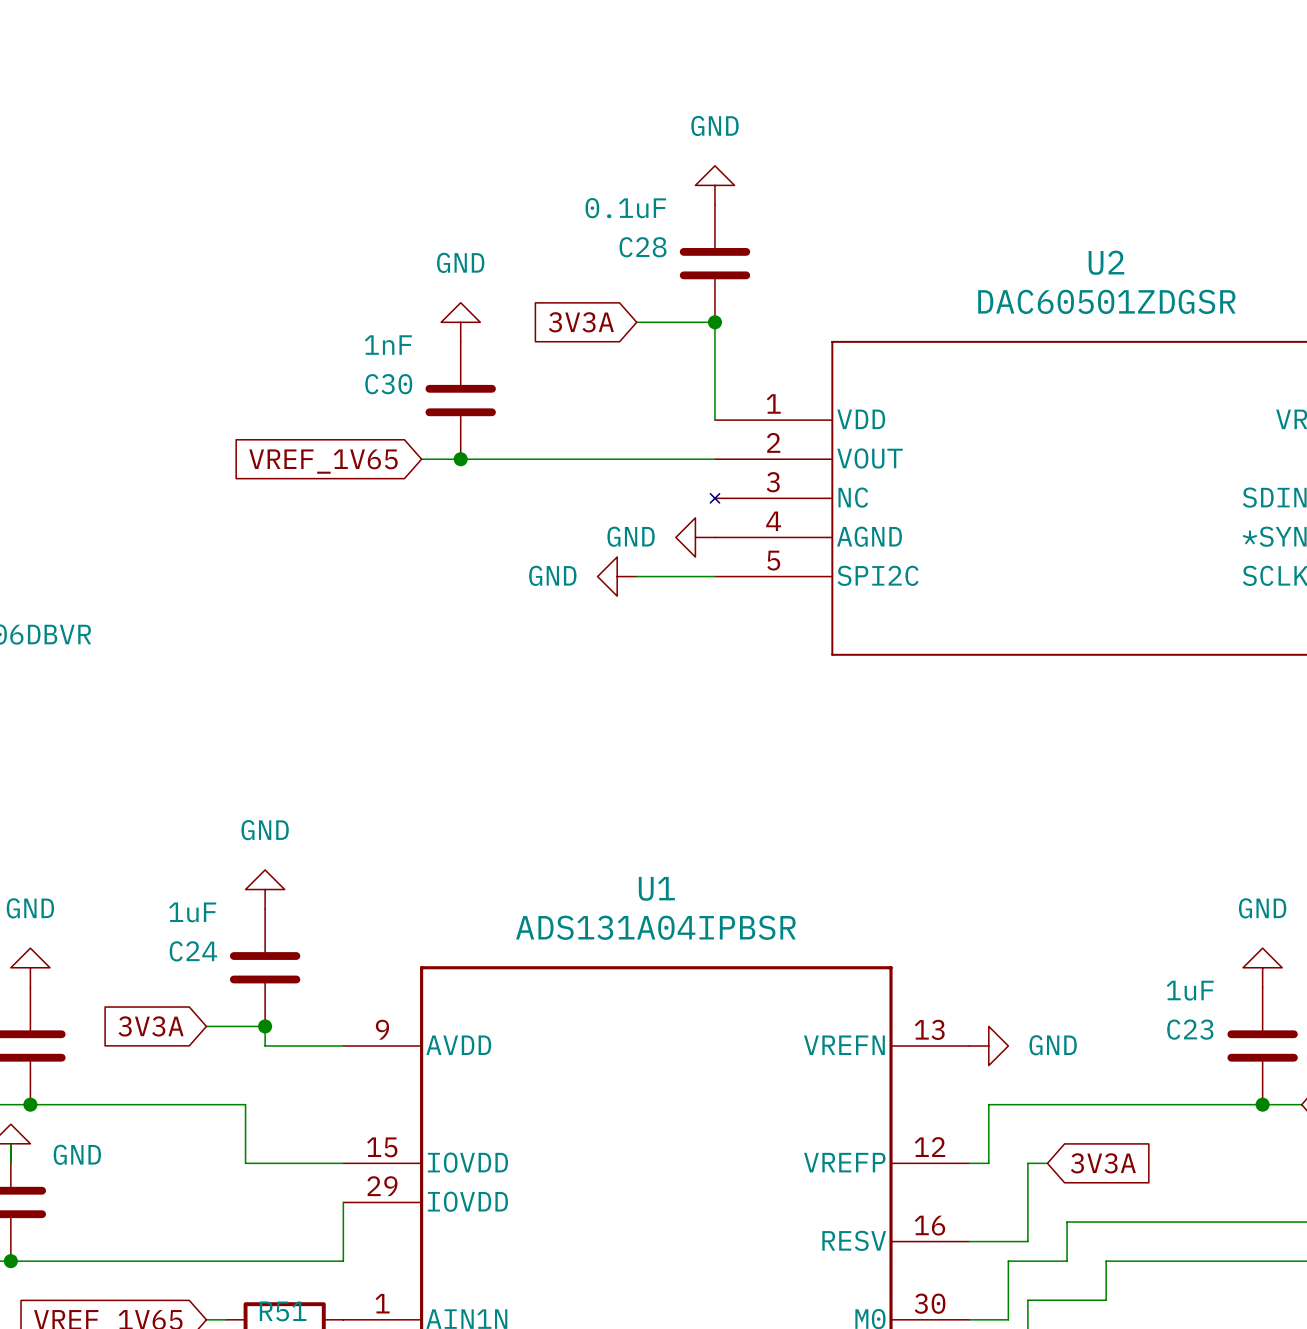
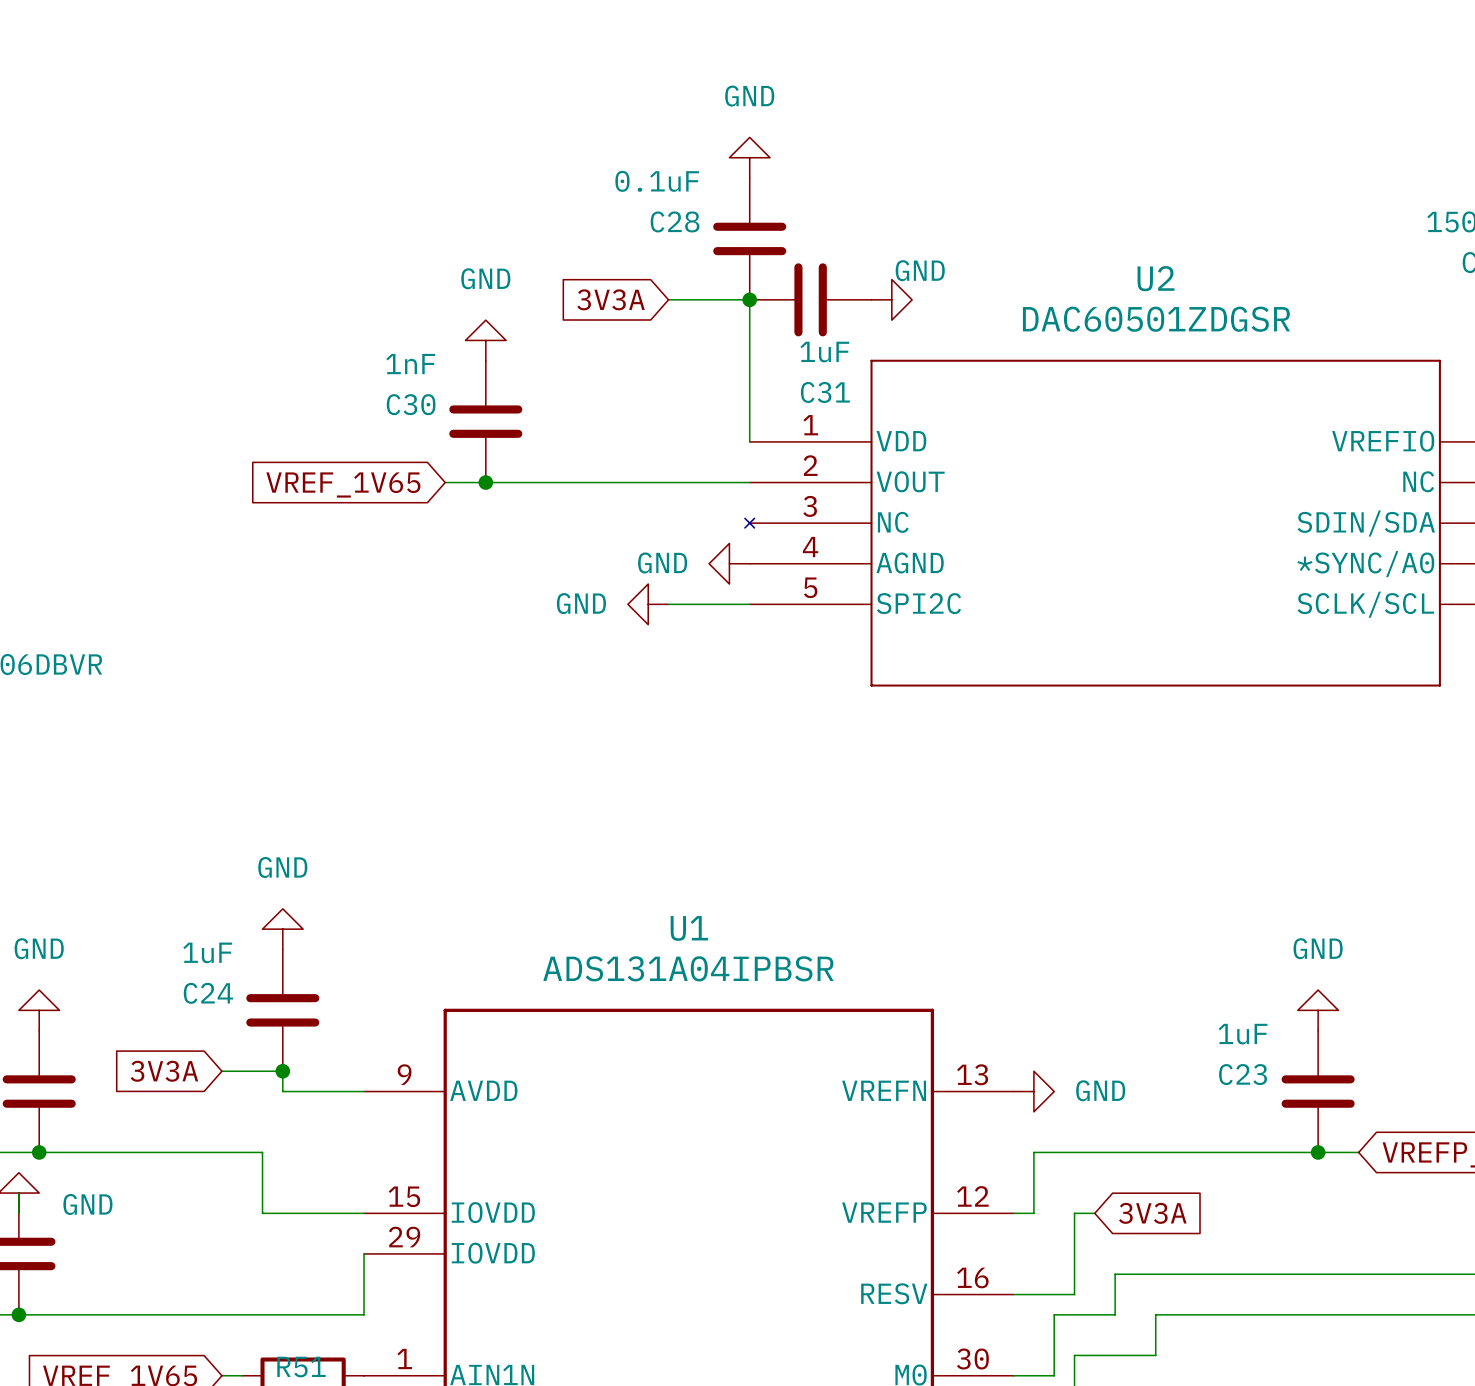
power symbol position: GND (714, 185) -> GND (749, 157)
C28 position: (714, 263) -> (749, 238)
C31: none -> 1uF (810, 299)
power symbol: none -> GND (891, 299)
global label position: 3V3A (581, 322) -> 3V3A (611, 299)
wire: (636, 322) (714, 322) -> (668, 299) (749, 299) (749, 340)
junction position: (714, 322) -> (749, 299)

